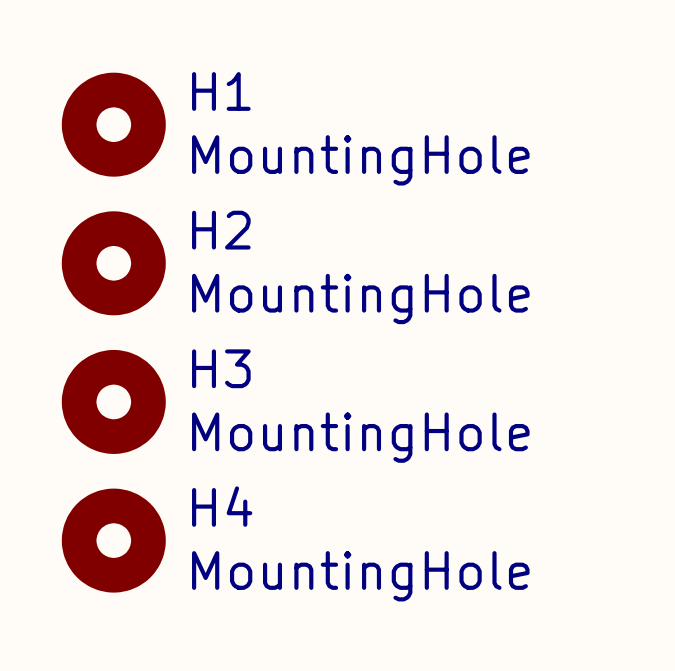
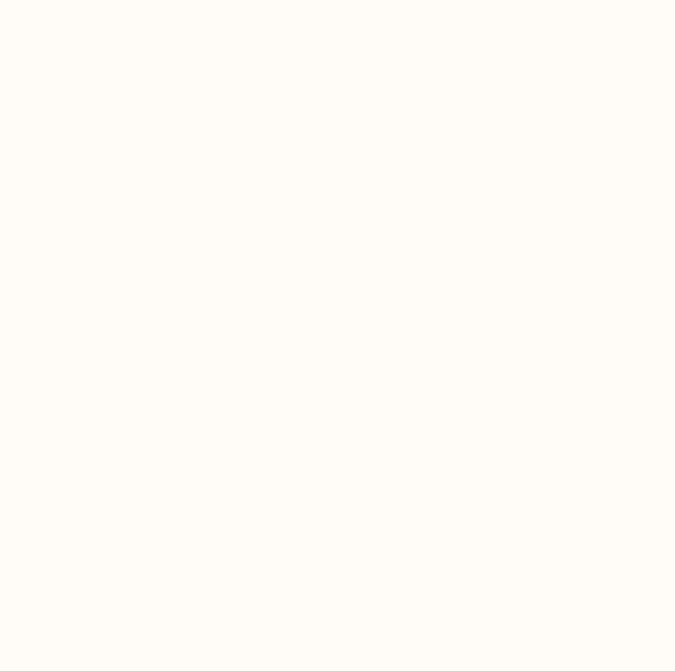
H1: MountingHole (113, 124) -> none
H2: MountingHole (113, 263) -> none
H3: MountingHole (113, 401) -> none
H4: MountingHole (113, 540) -> none

